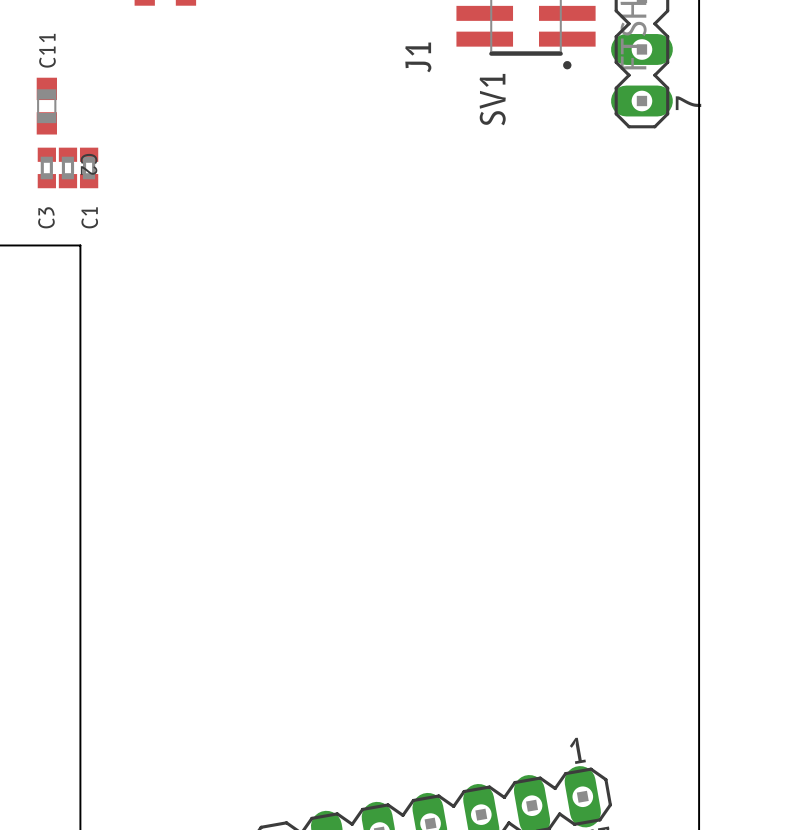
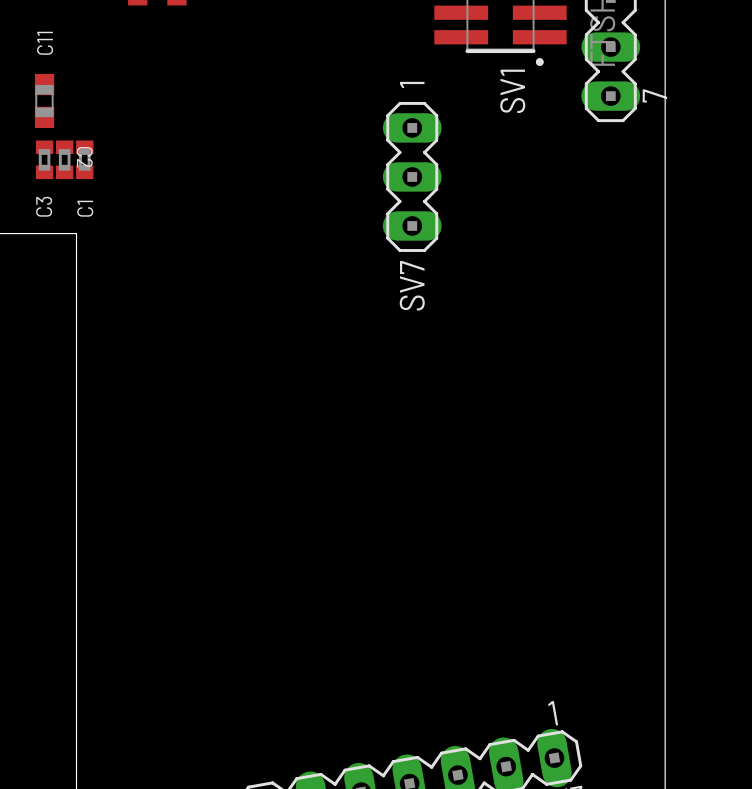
J1 name: J1 (418, 57) -> none
SV1 name position: SV1 (492, 99) -> SV1 (512, 91)
SV7: none -> (412, 176)

